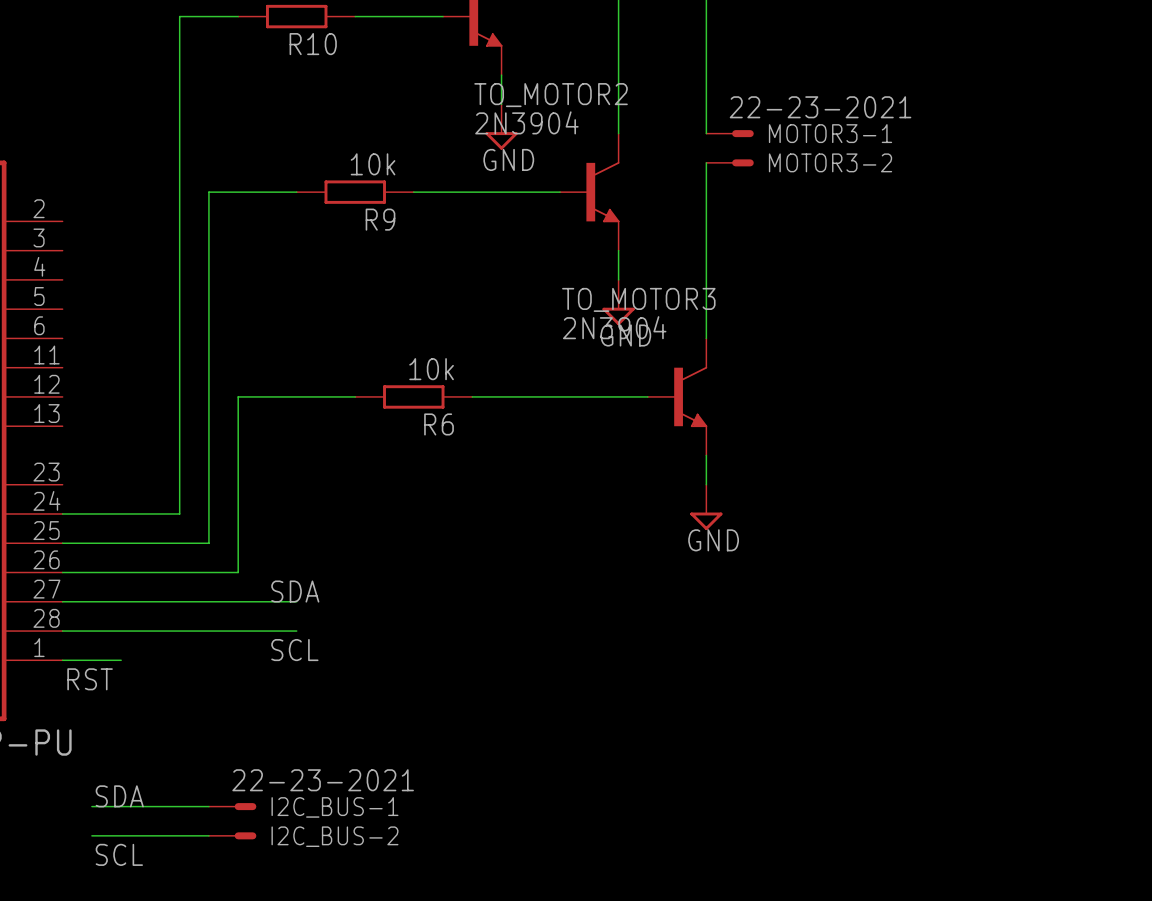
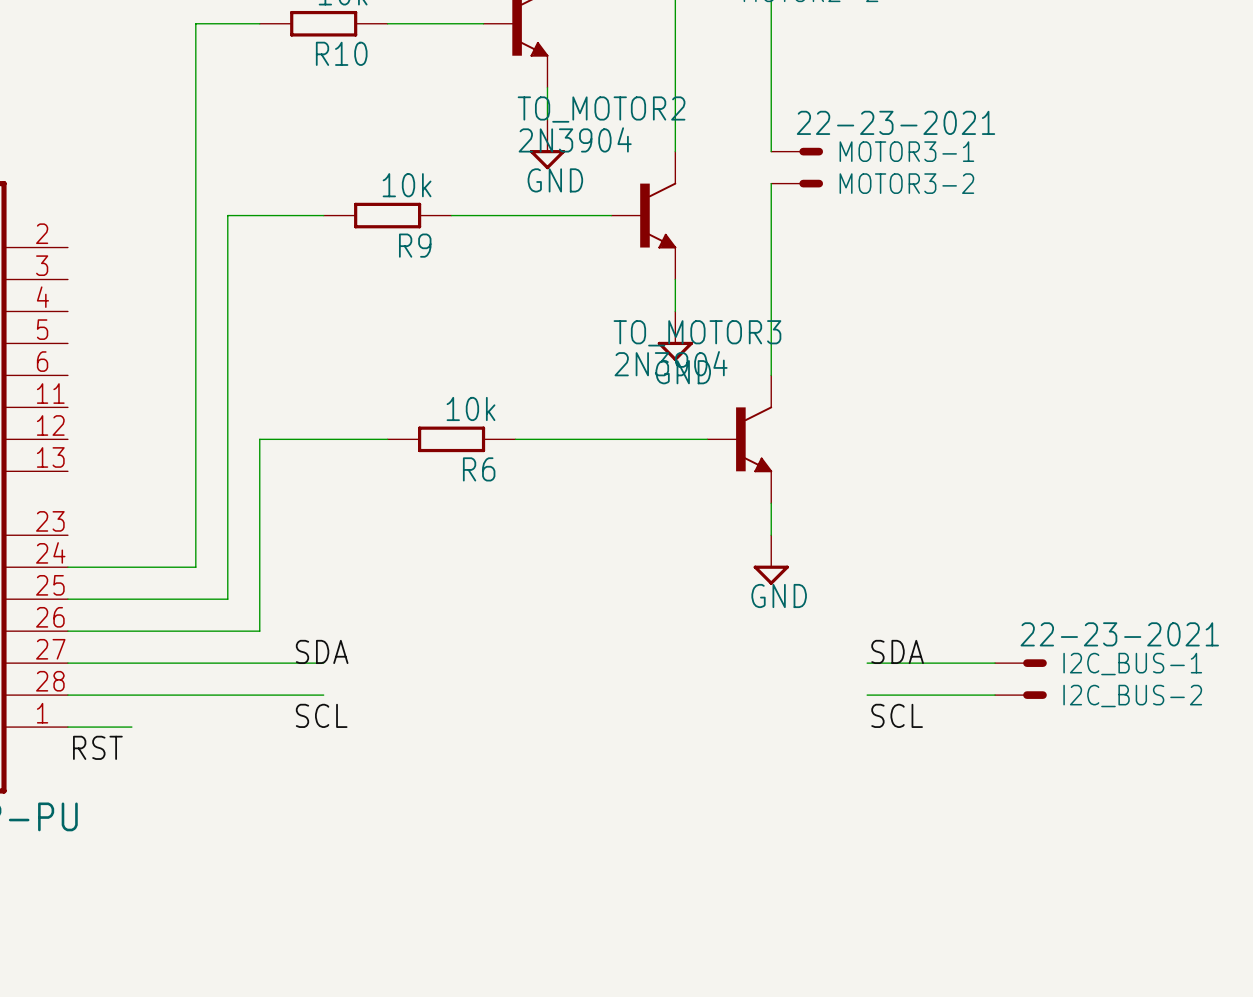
label: none -> SDA (897, 651)
wire: none -> (867, 663) (995, 663)
wire: none -> (867, 695) (995, 695)
label: none -> SCL (897, 715)
label: SDA (119, 796) -> none
wire: (91, 806) (208, 806) -> none
I2C_BUS-1 position: (232, 806) -> (1020, 663)
wire: (91, 835) (208, 835) -> none
I2C_BUS-2 position: (232, 835) -> (1020, 695)
label: SCL (119, 854) -> none

